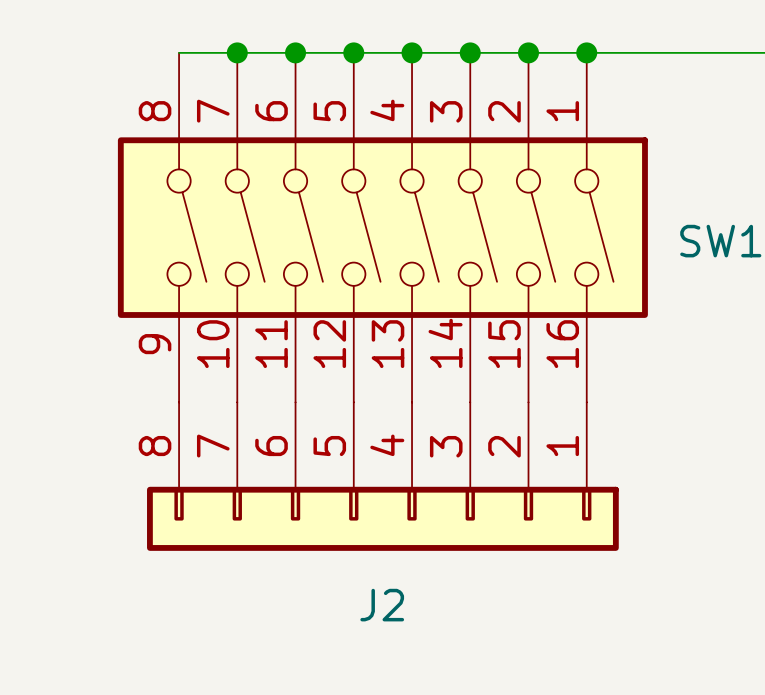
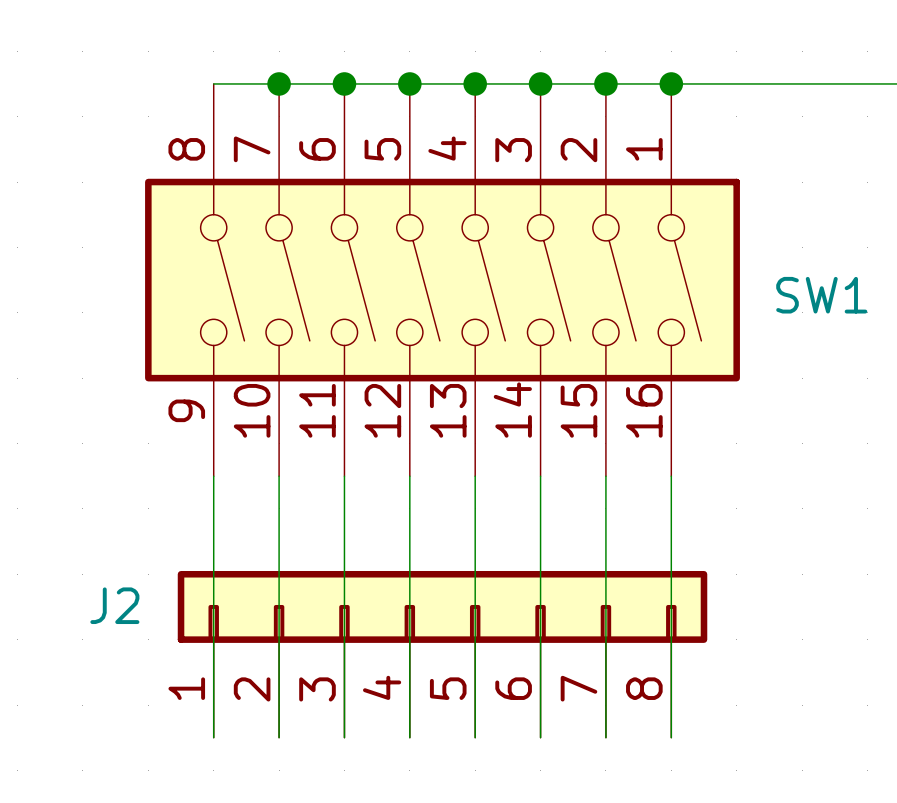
J2 rotation: 0° (382, 518) -> 180° (442, 606)
J2 name position: J2 (382, 605) -> J2 (114, 605)

